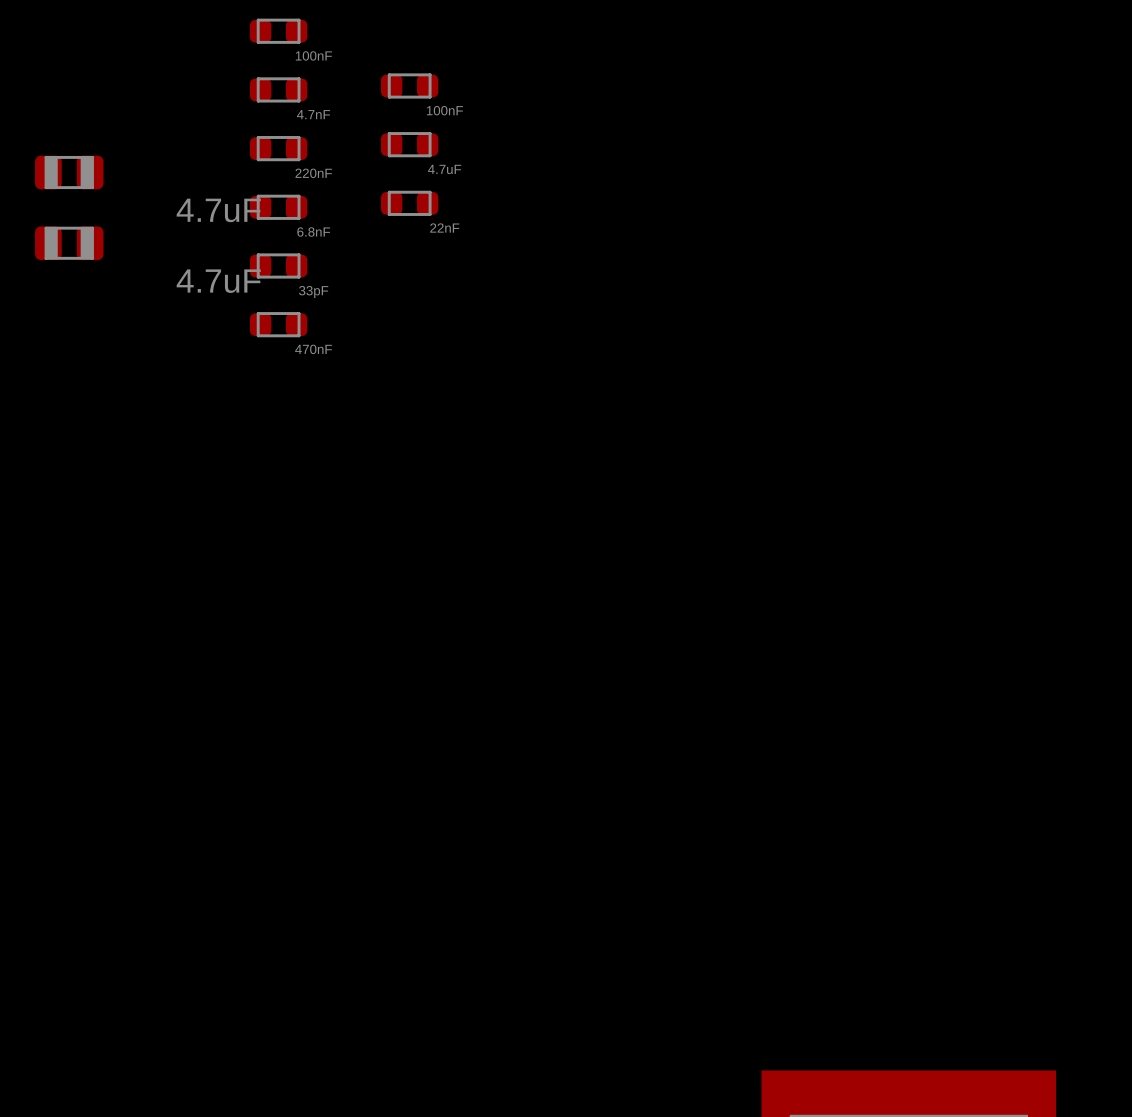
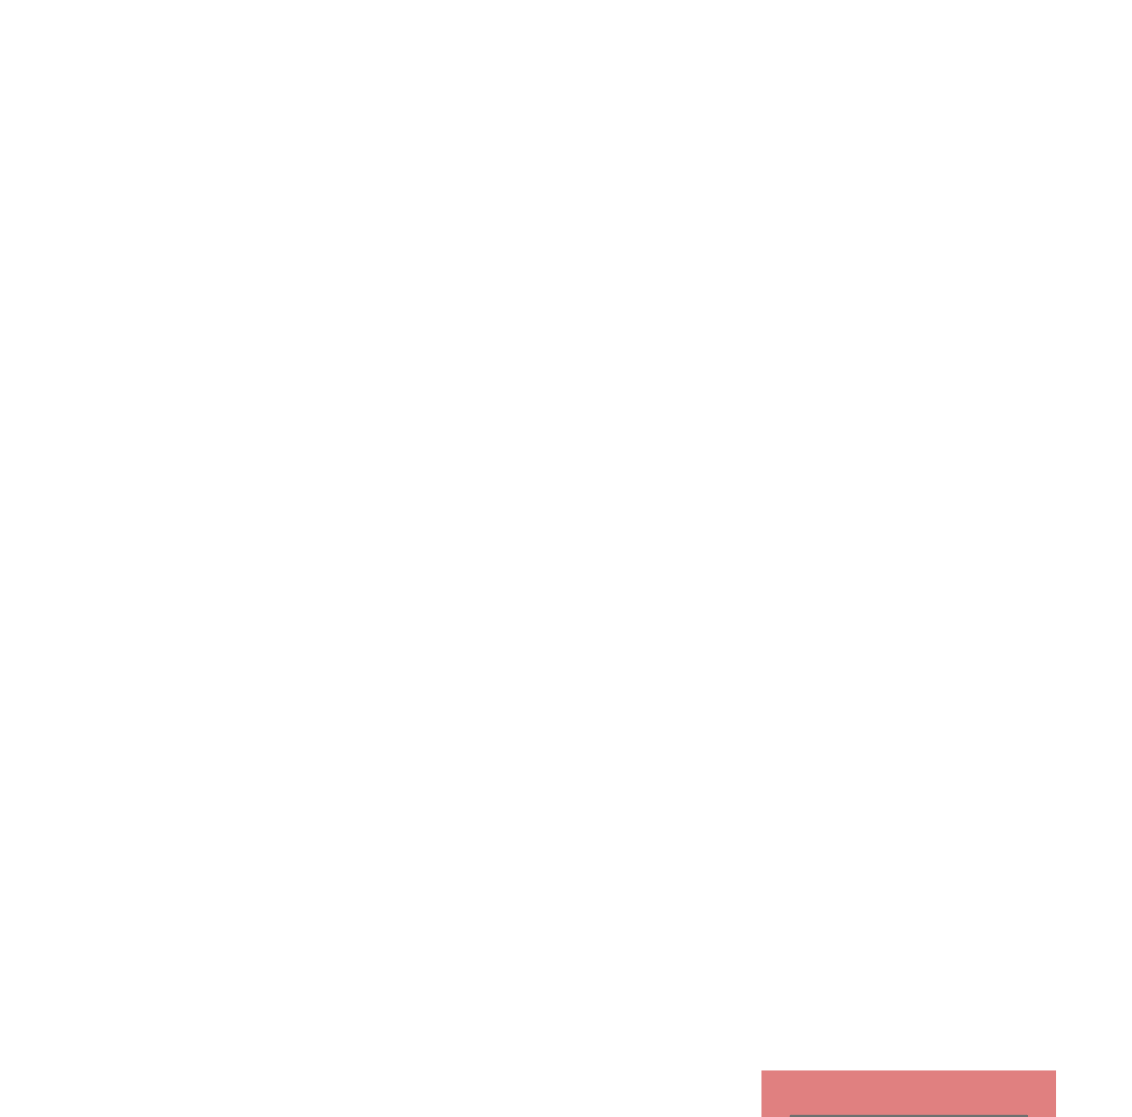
part: 100nF (278, 31) -> none
part: 100nF (409, 85) -> none
part: 4.7nF (278, 89) -> none
part: 4.7uF (409, 144) -> none
part: 220nF (278, 148) -> none
part: 4.7uF (69, 172) -> none
part: 22nF (409, 203) -> none
part: 6.8nF (278, 207) -> none
part: 4.7uF (69, 243) -> none
part: 33pF (278, 265) -> none
part: 470nF (278, 324) -> none

